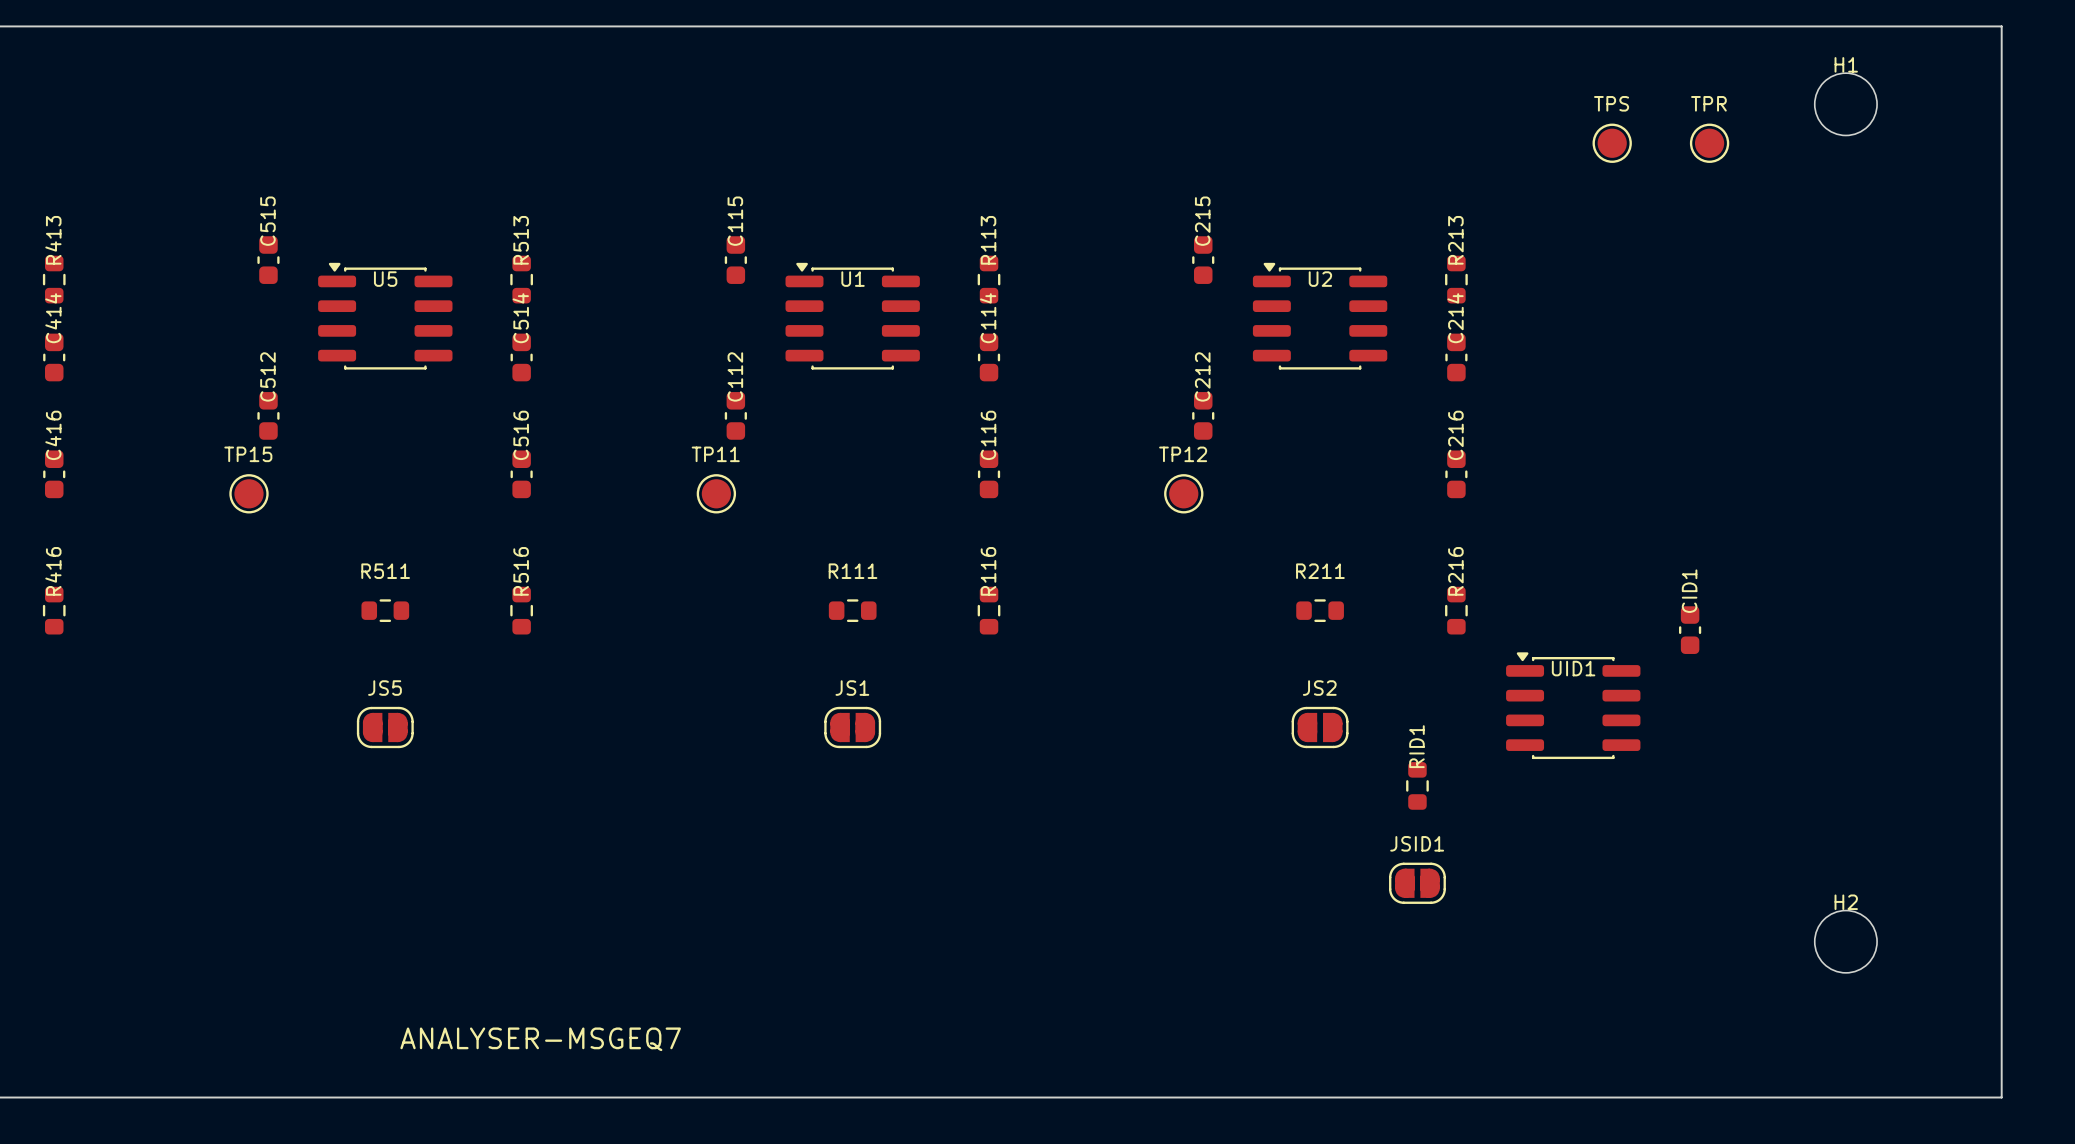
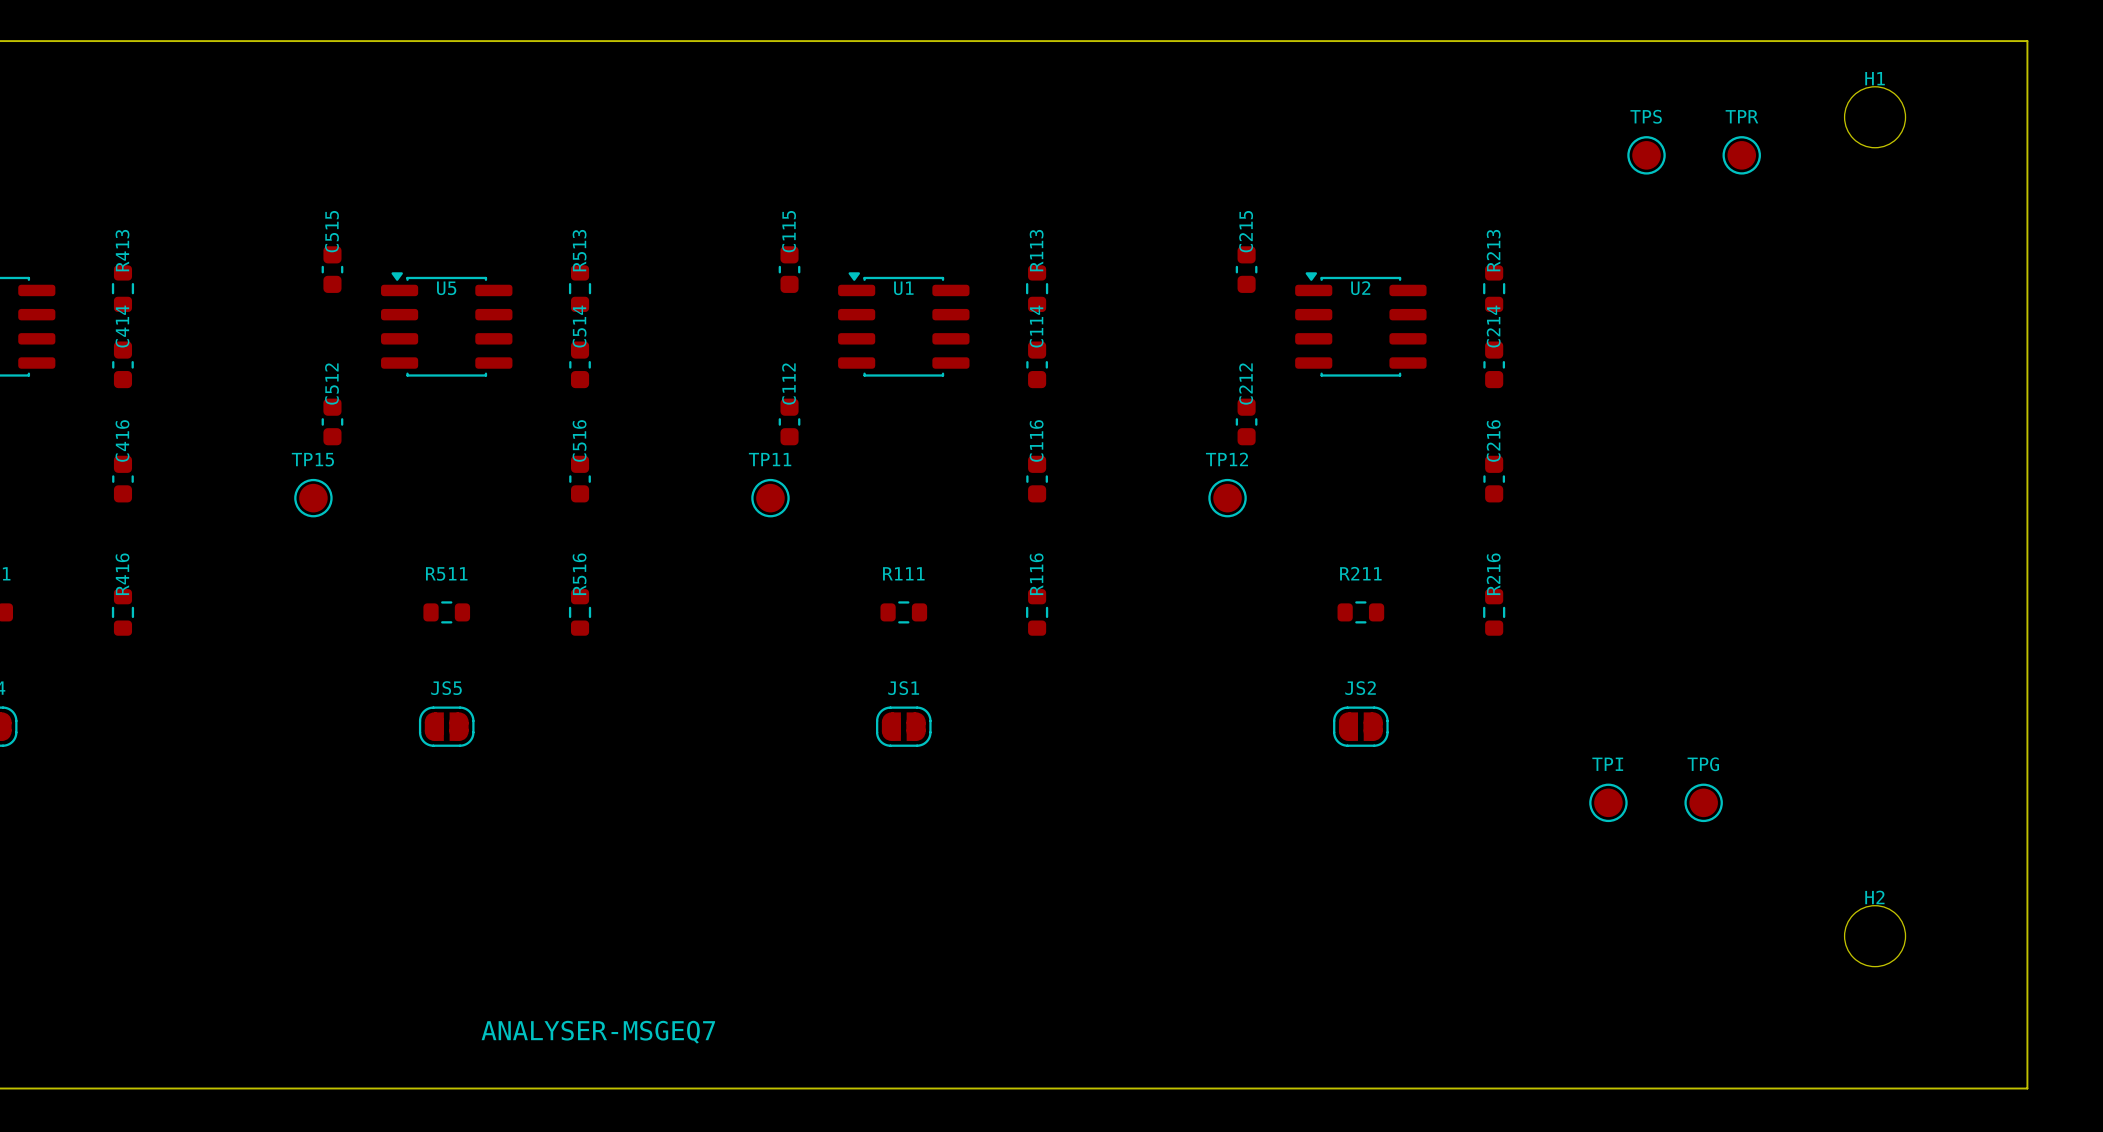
CID1: (1690, 630) -> none
UID1: (1573, 705) -> none
RID1: (1417, 785) -> none
TPI: none -> (1608, 802)
TPG: none -> (1703, 802)
JSID1: (1417, 883) -> none

